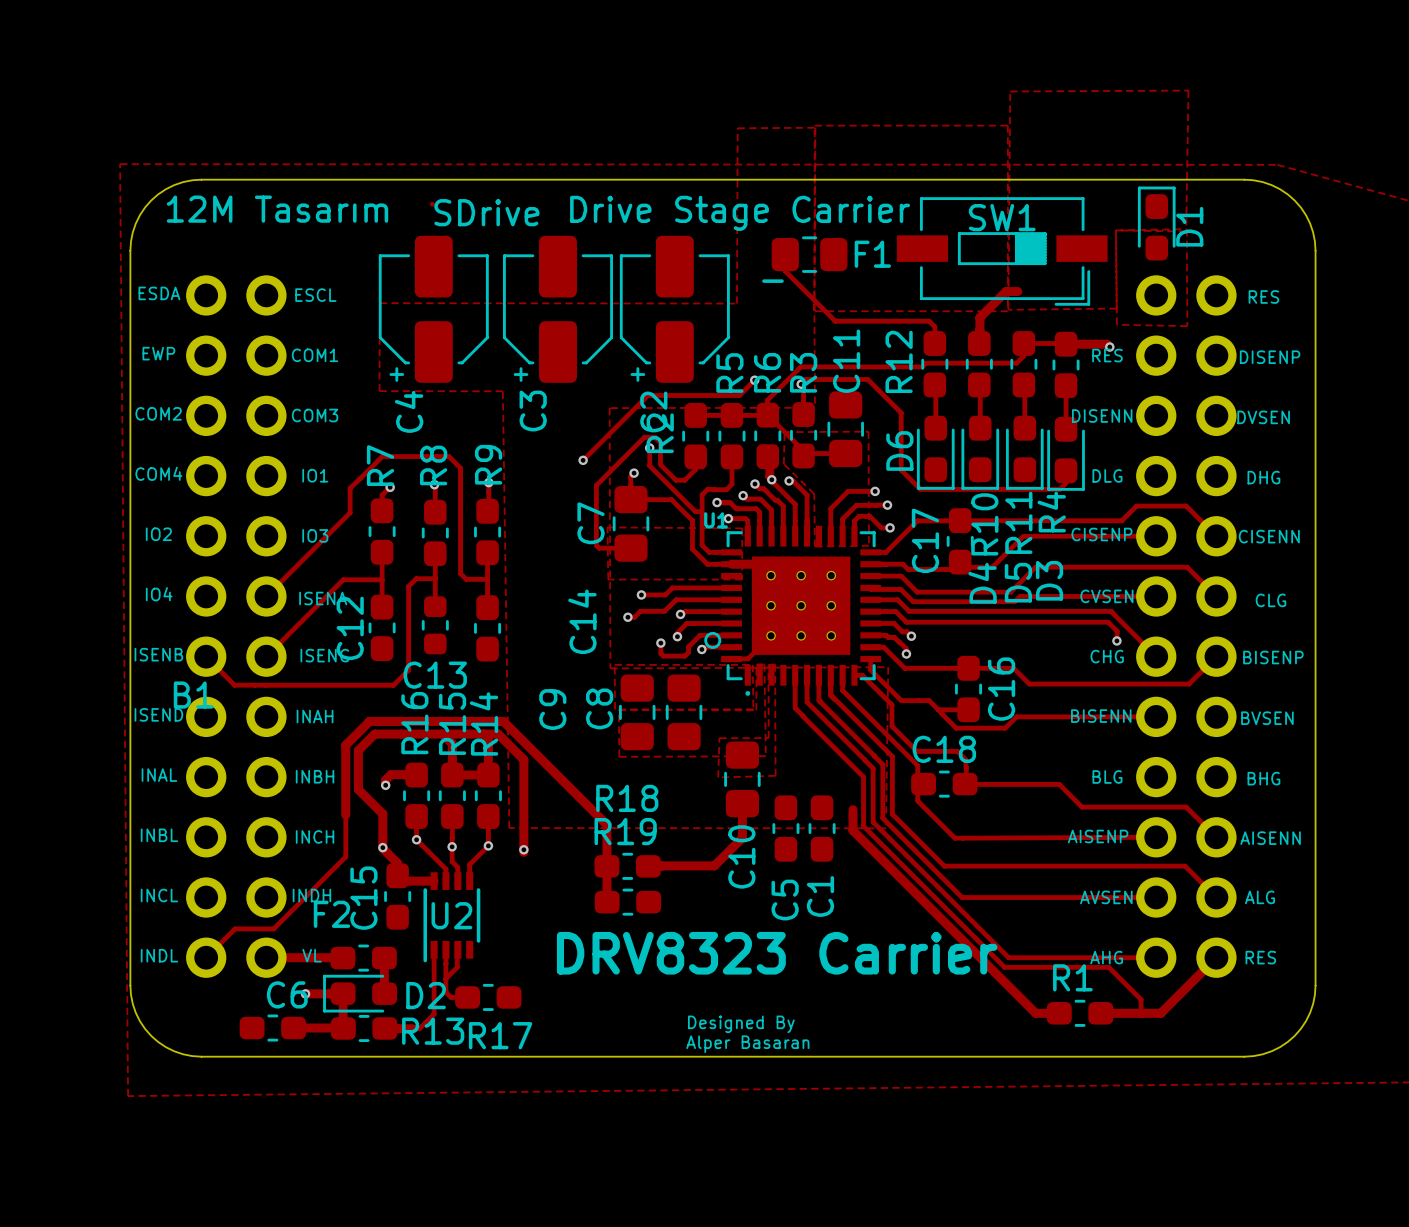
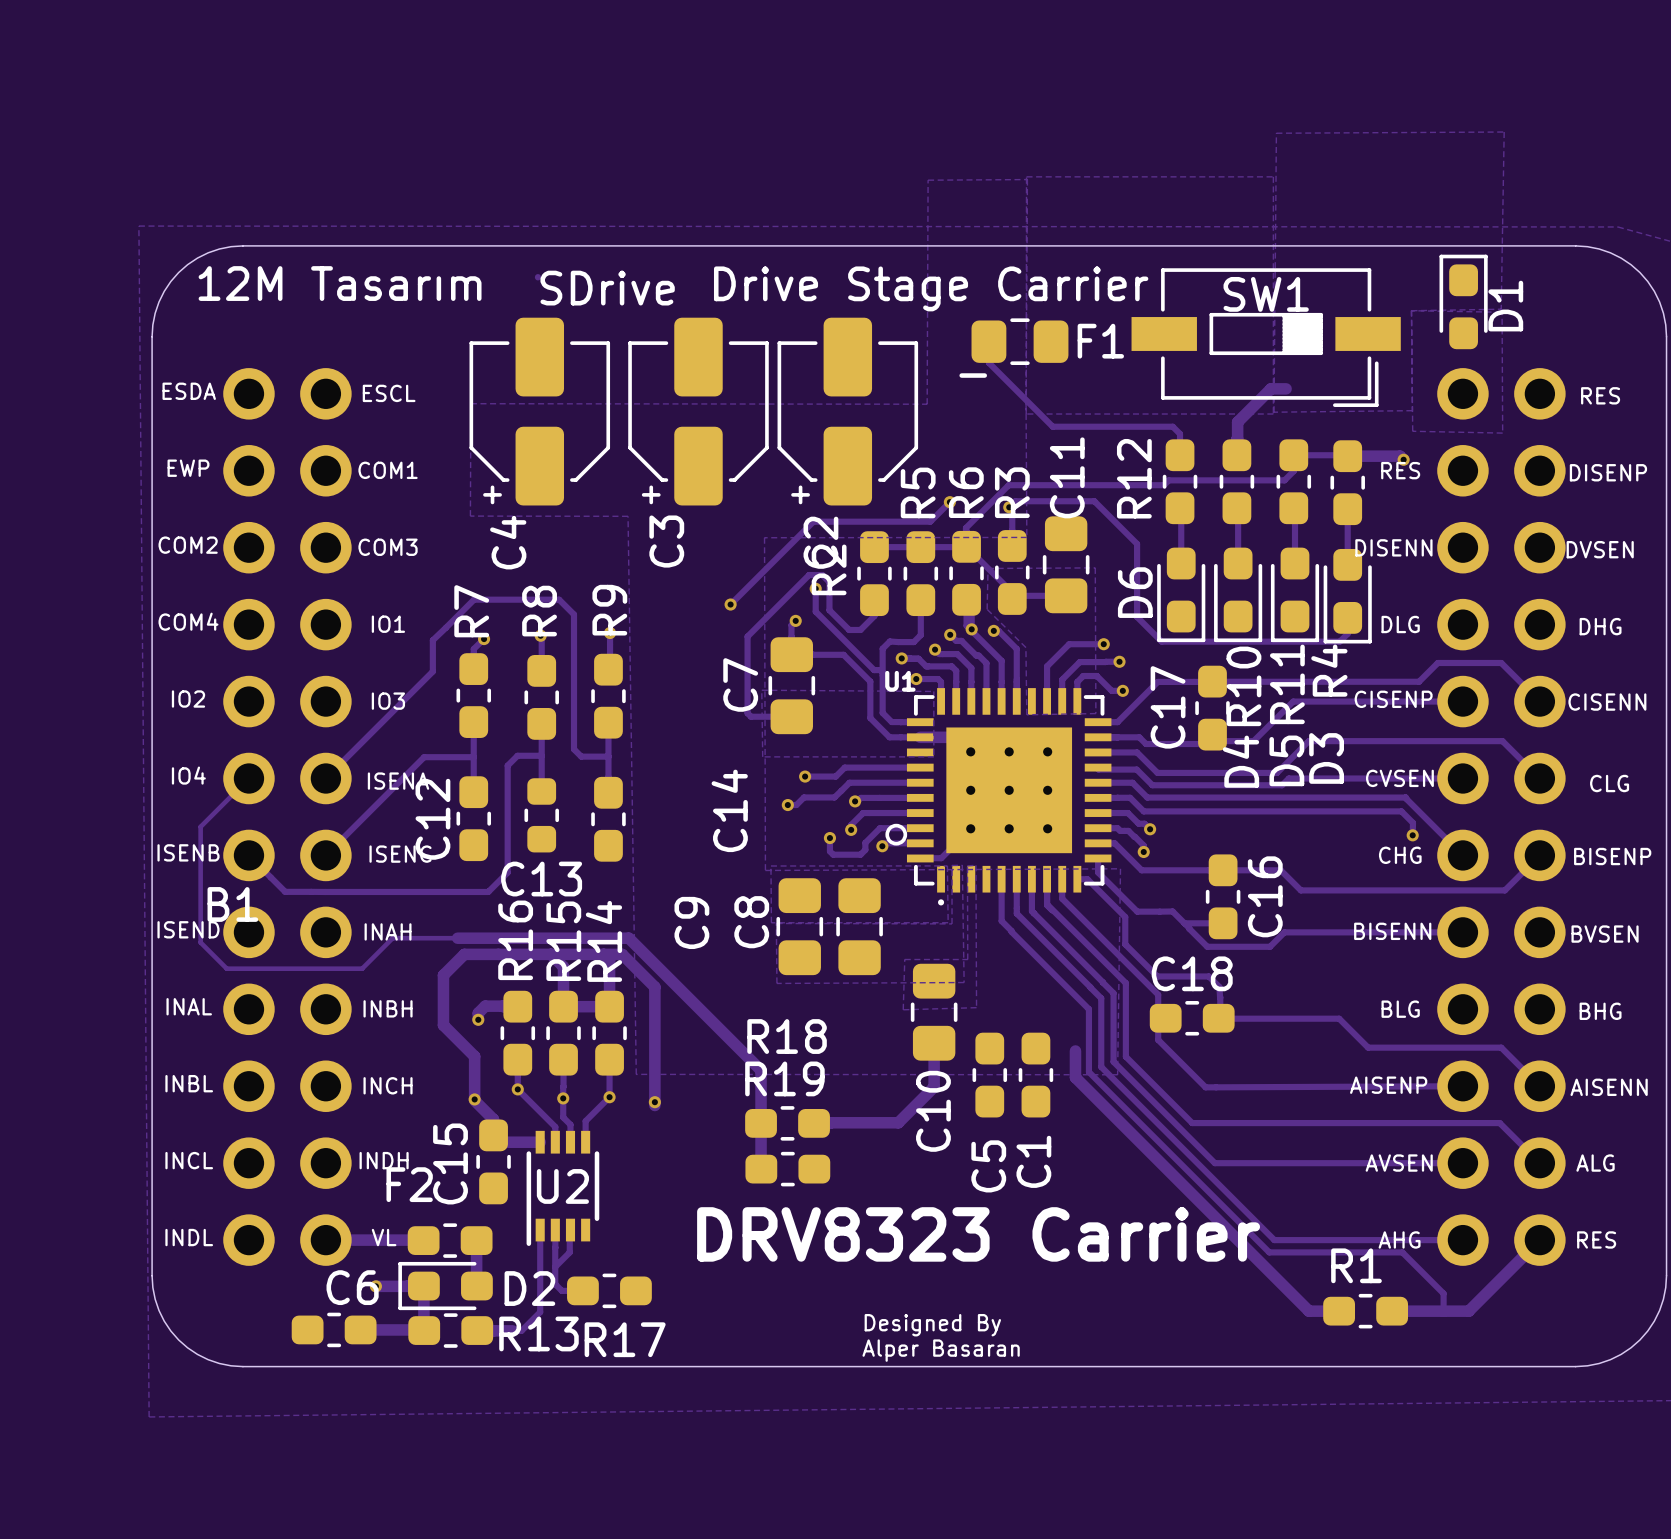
track: (369, 721) (345, 745) (345, 856) (273, 928) (234, 928) (206, 957) -> (457, 938) (392, 938) (362, 968) (226, 968) (200, 942) (200, 826) (248, 778)

